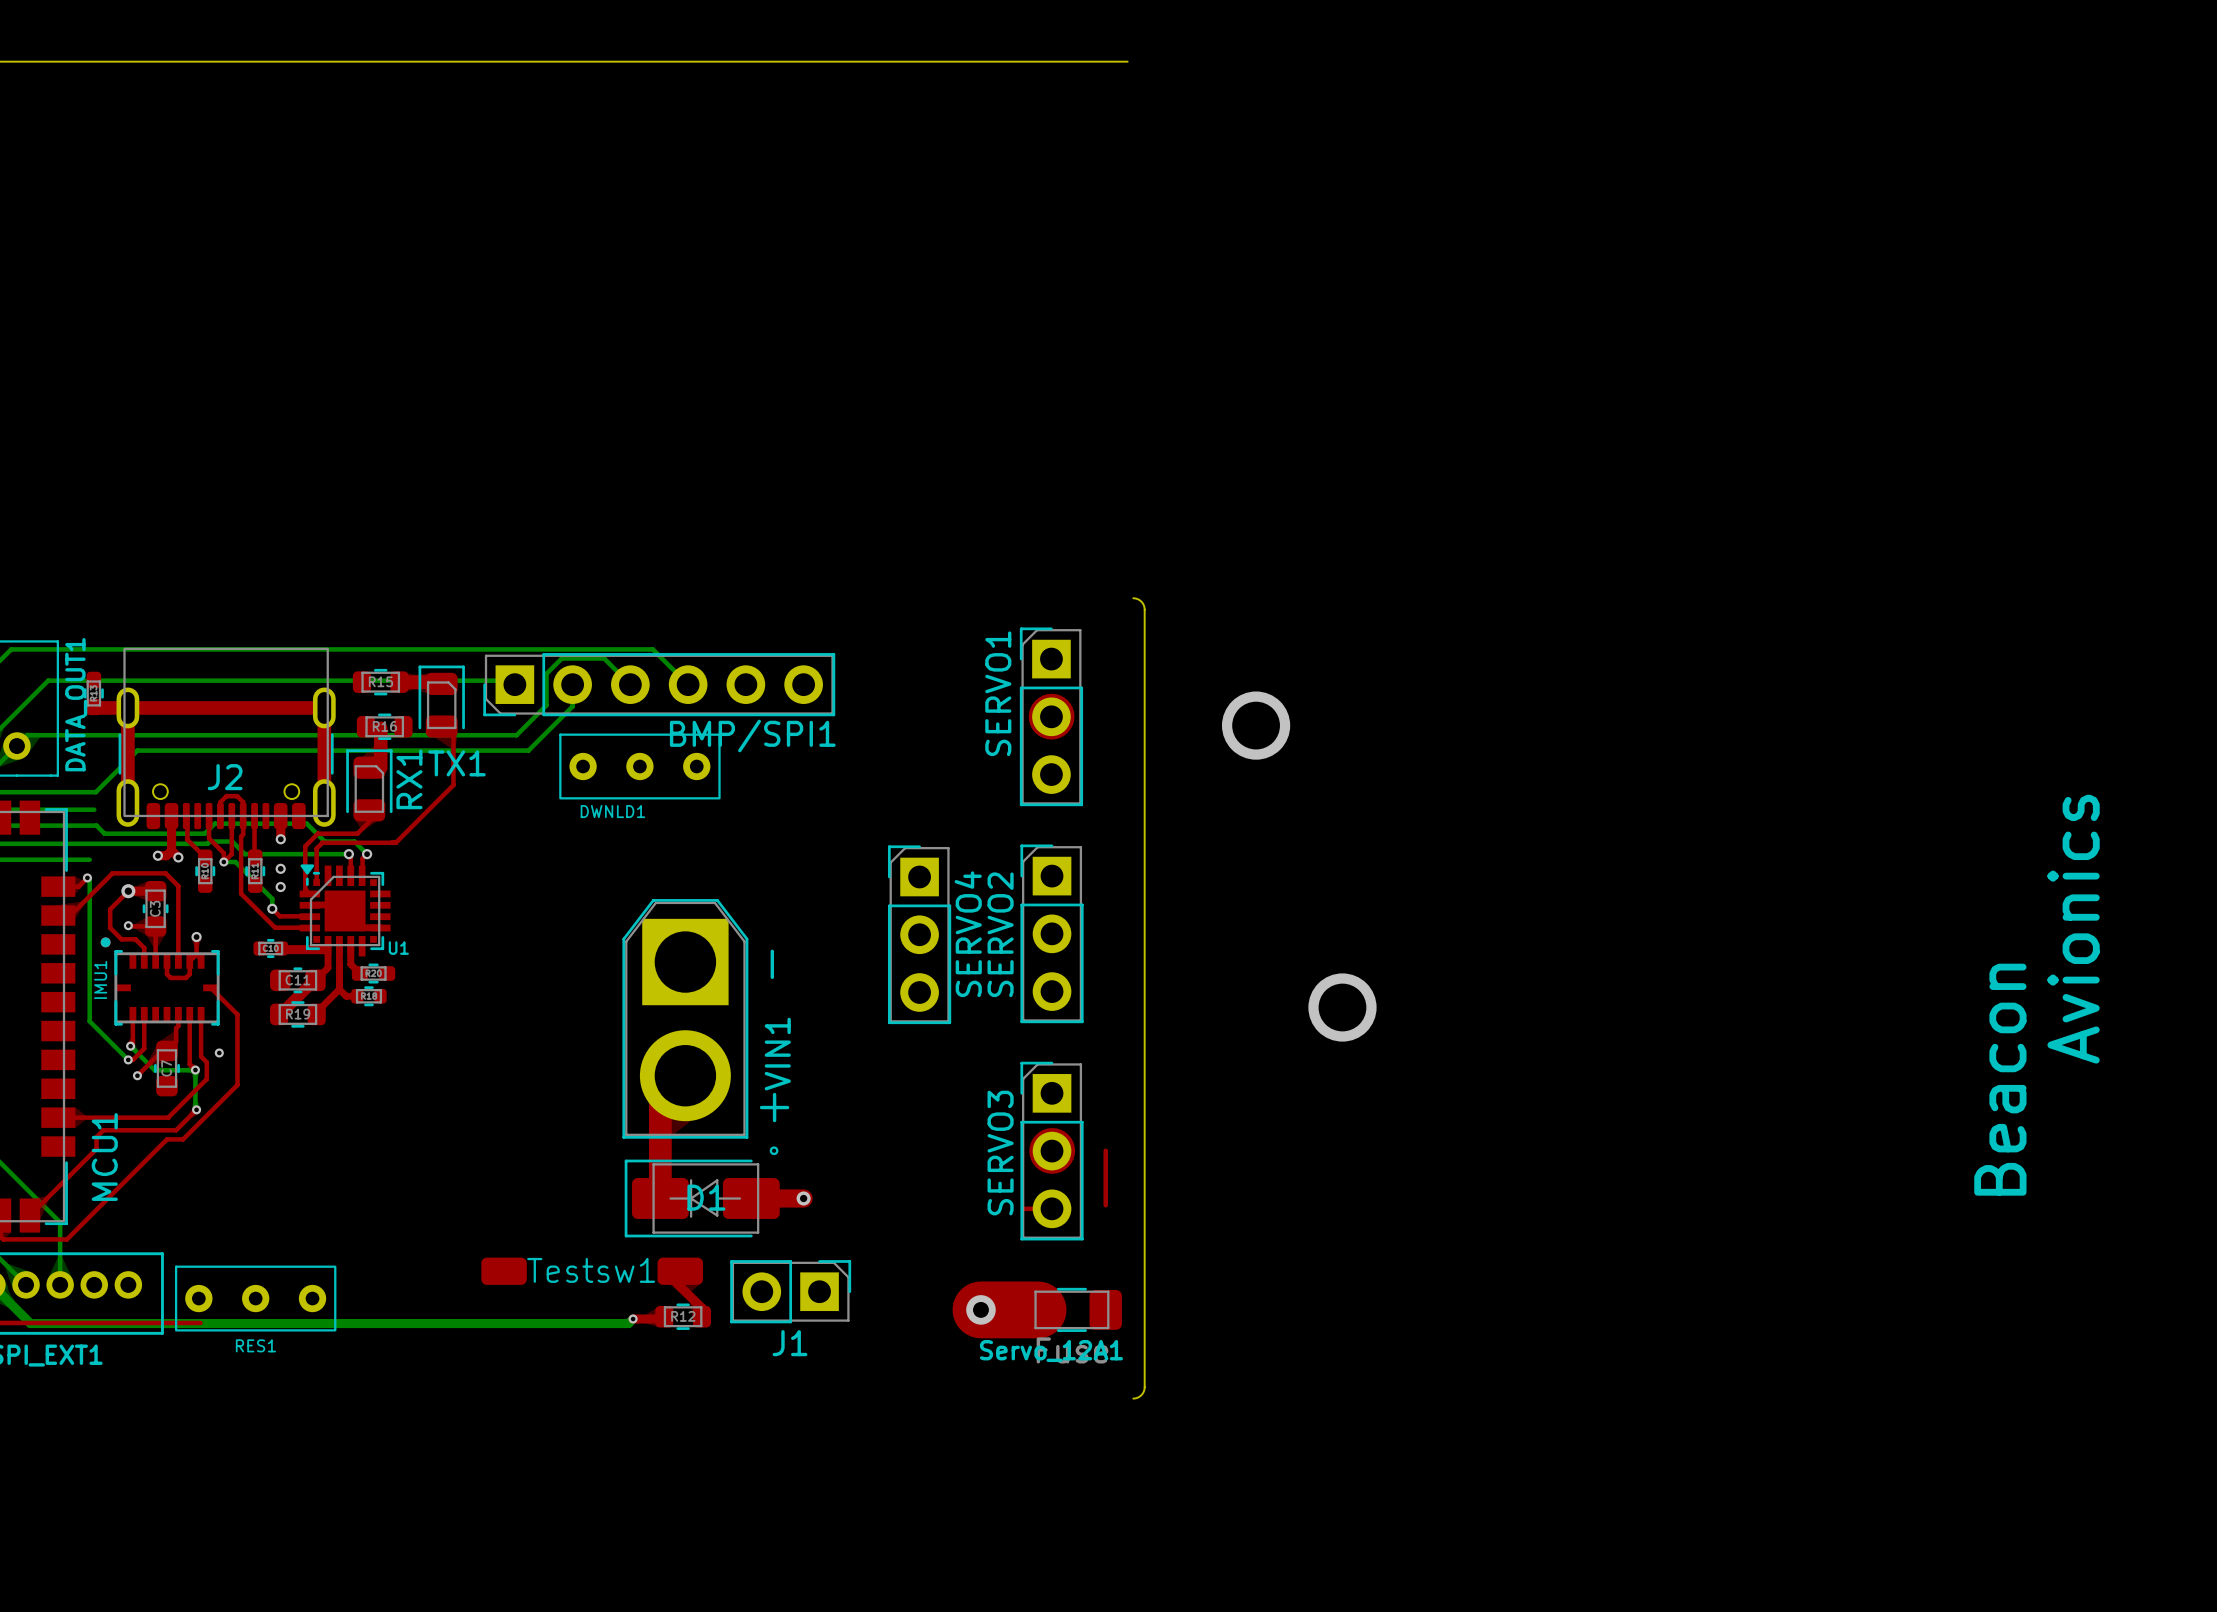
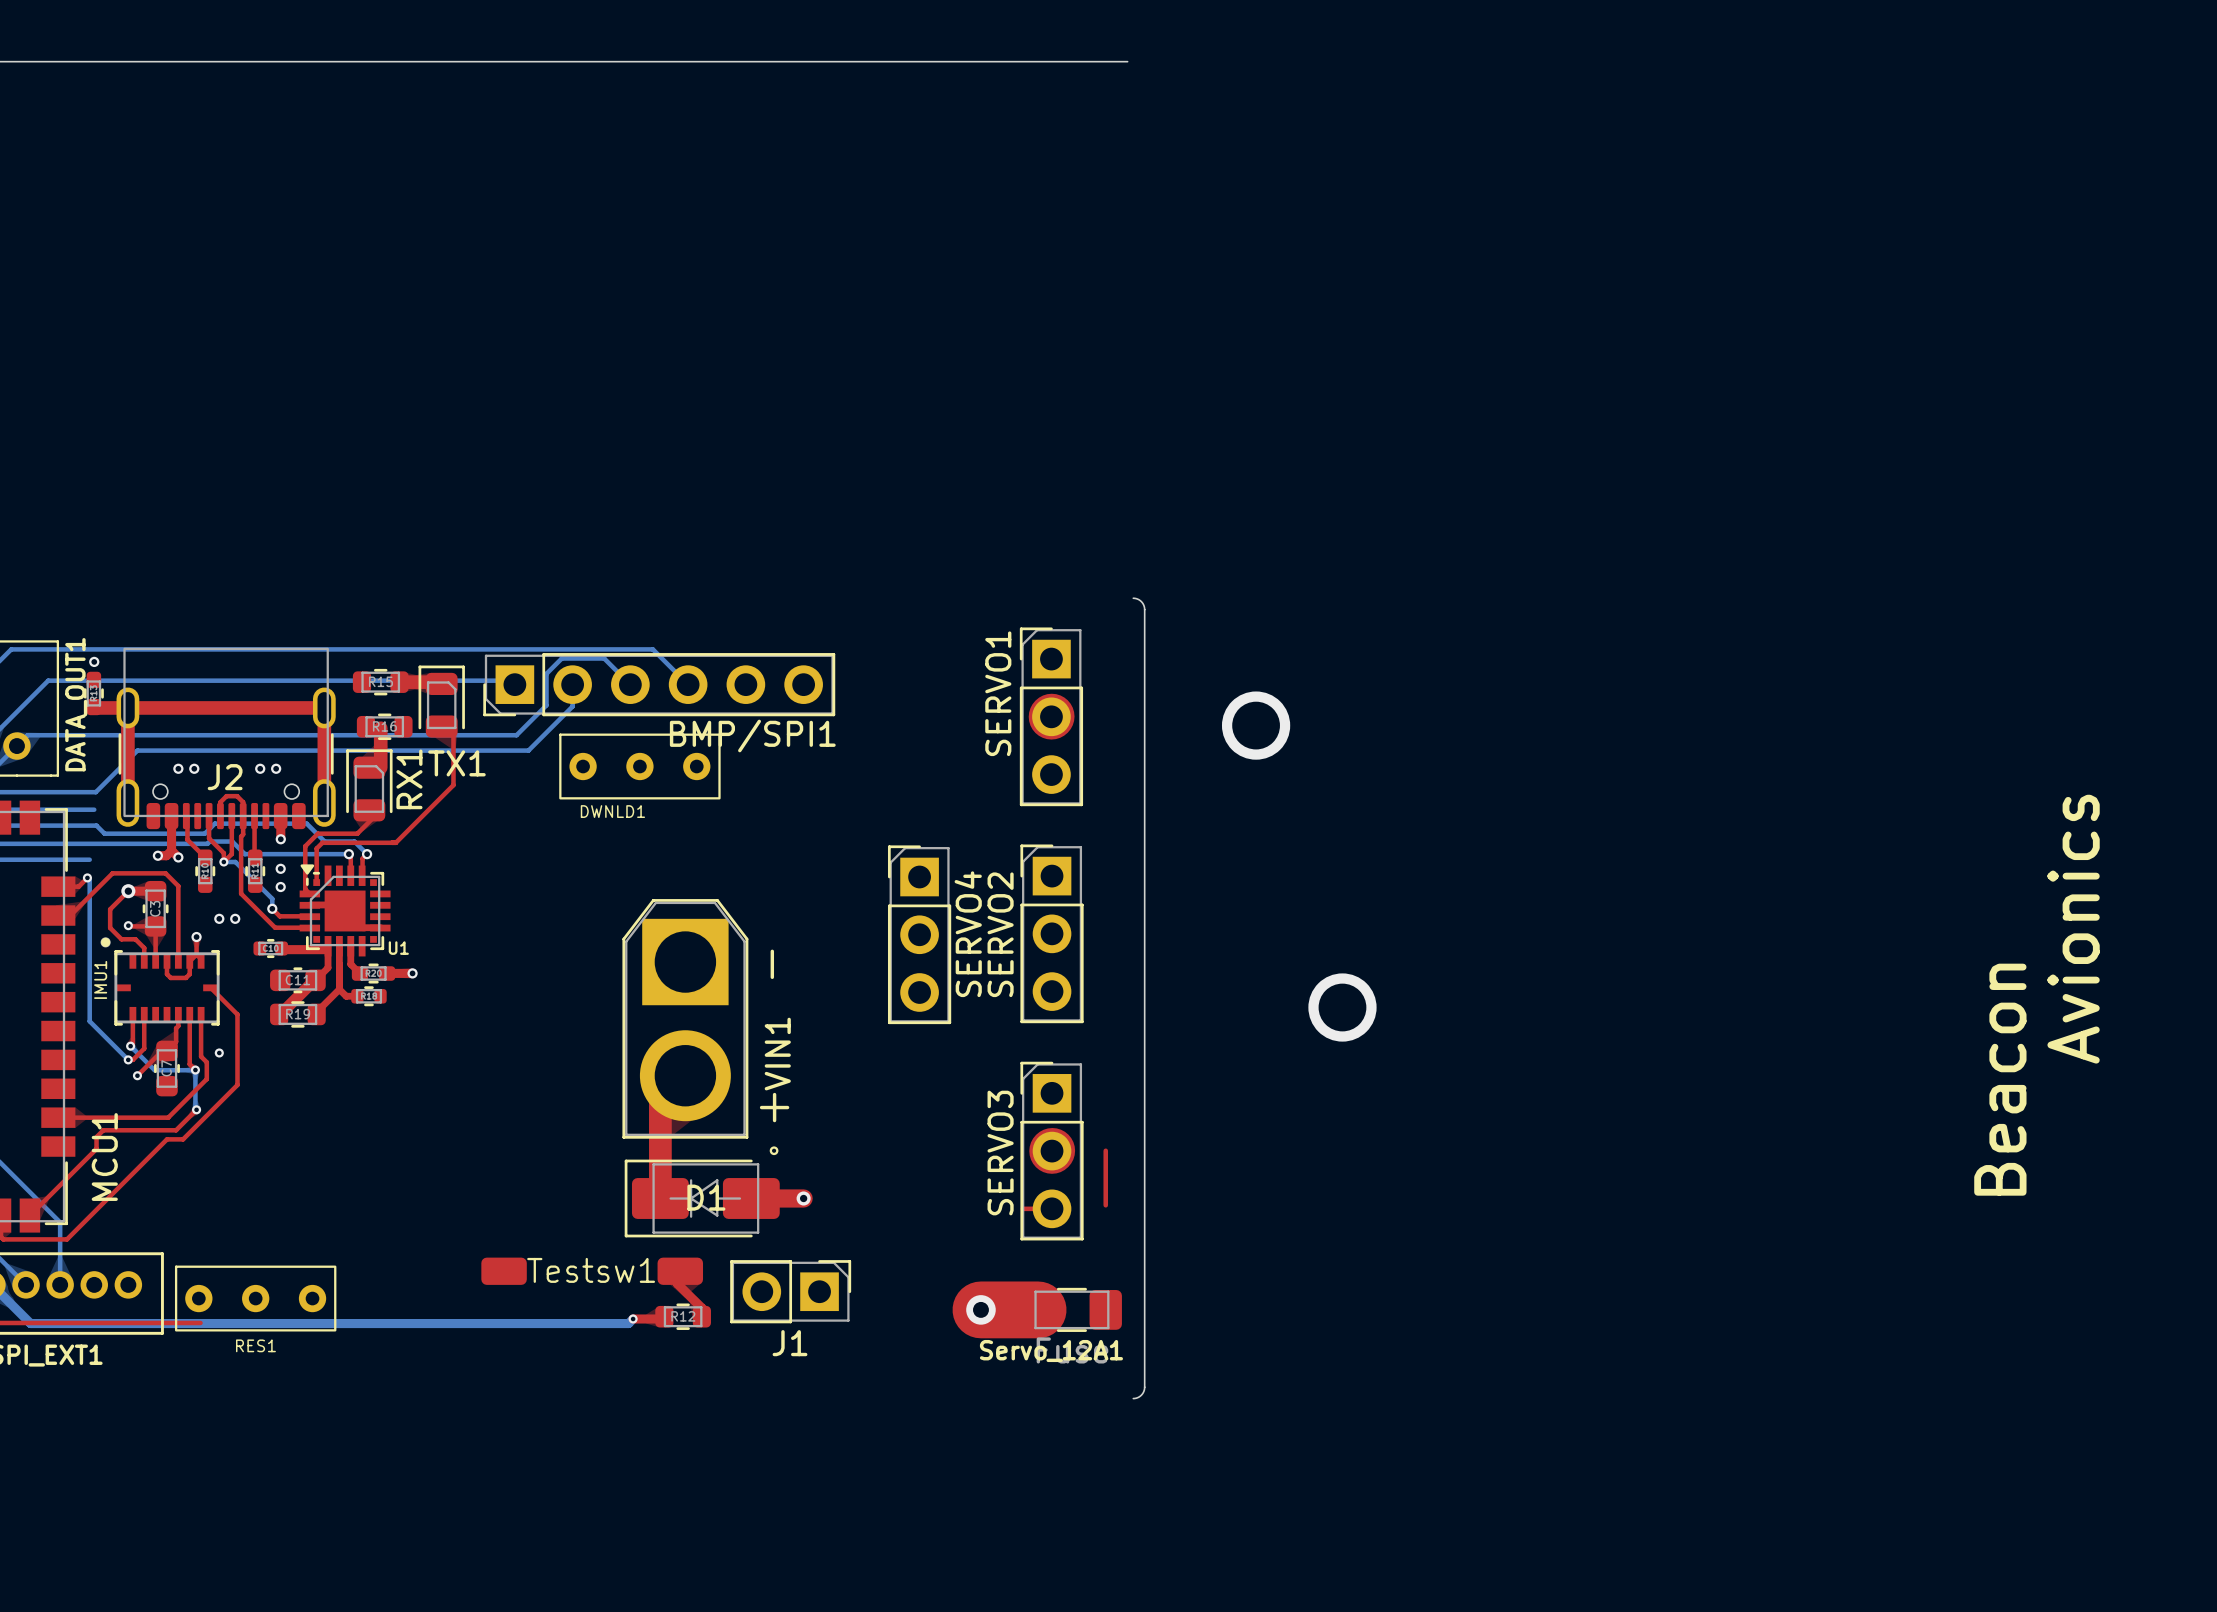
via: none -> (94, 661)
via: none -> (178, 768)
via: none -> (194, 768)
via: none -> (260, 768)
via: none -> (276, 768)
via: none -> (219, 918)
via: none -> (235, 918)
top track: none -> (387, 973) (412, 973)
via: none -> (412, 973)

